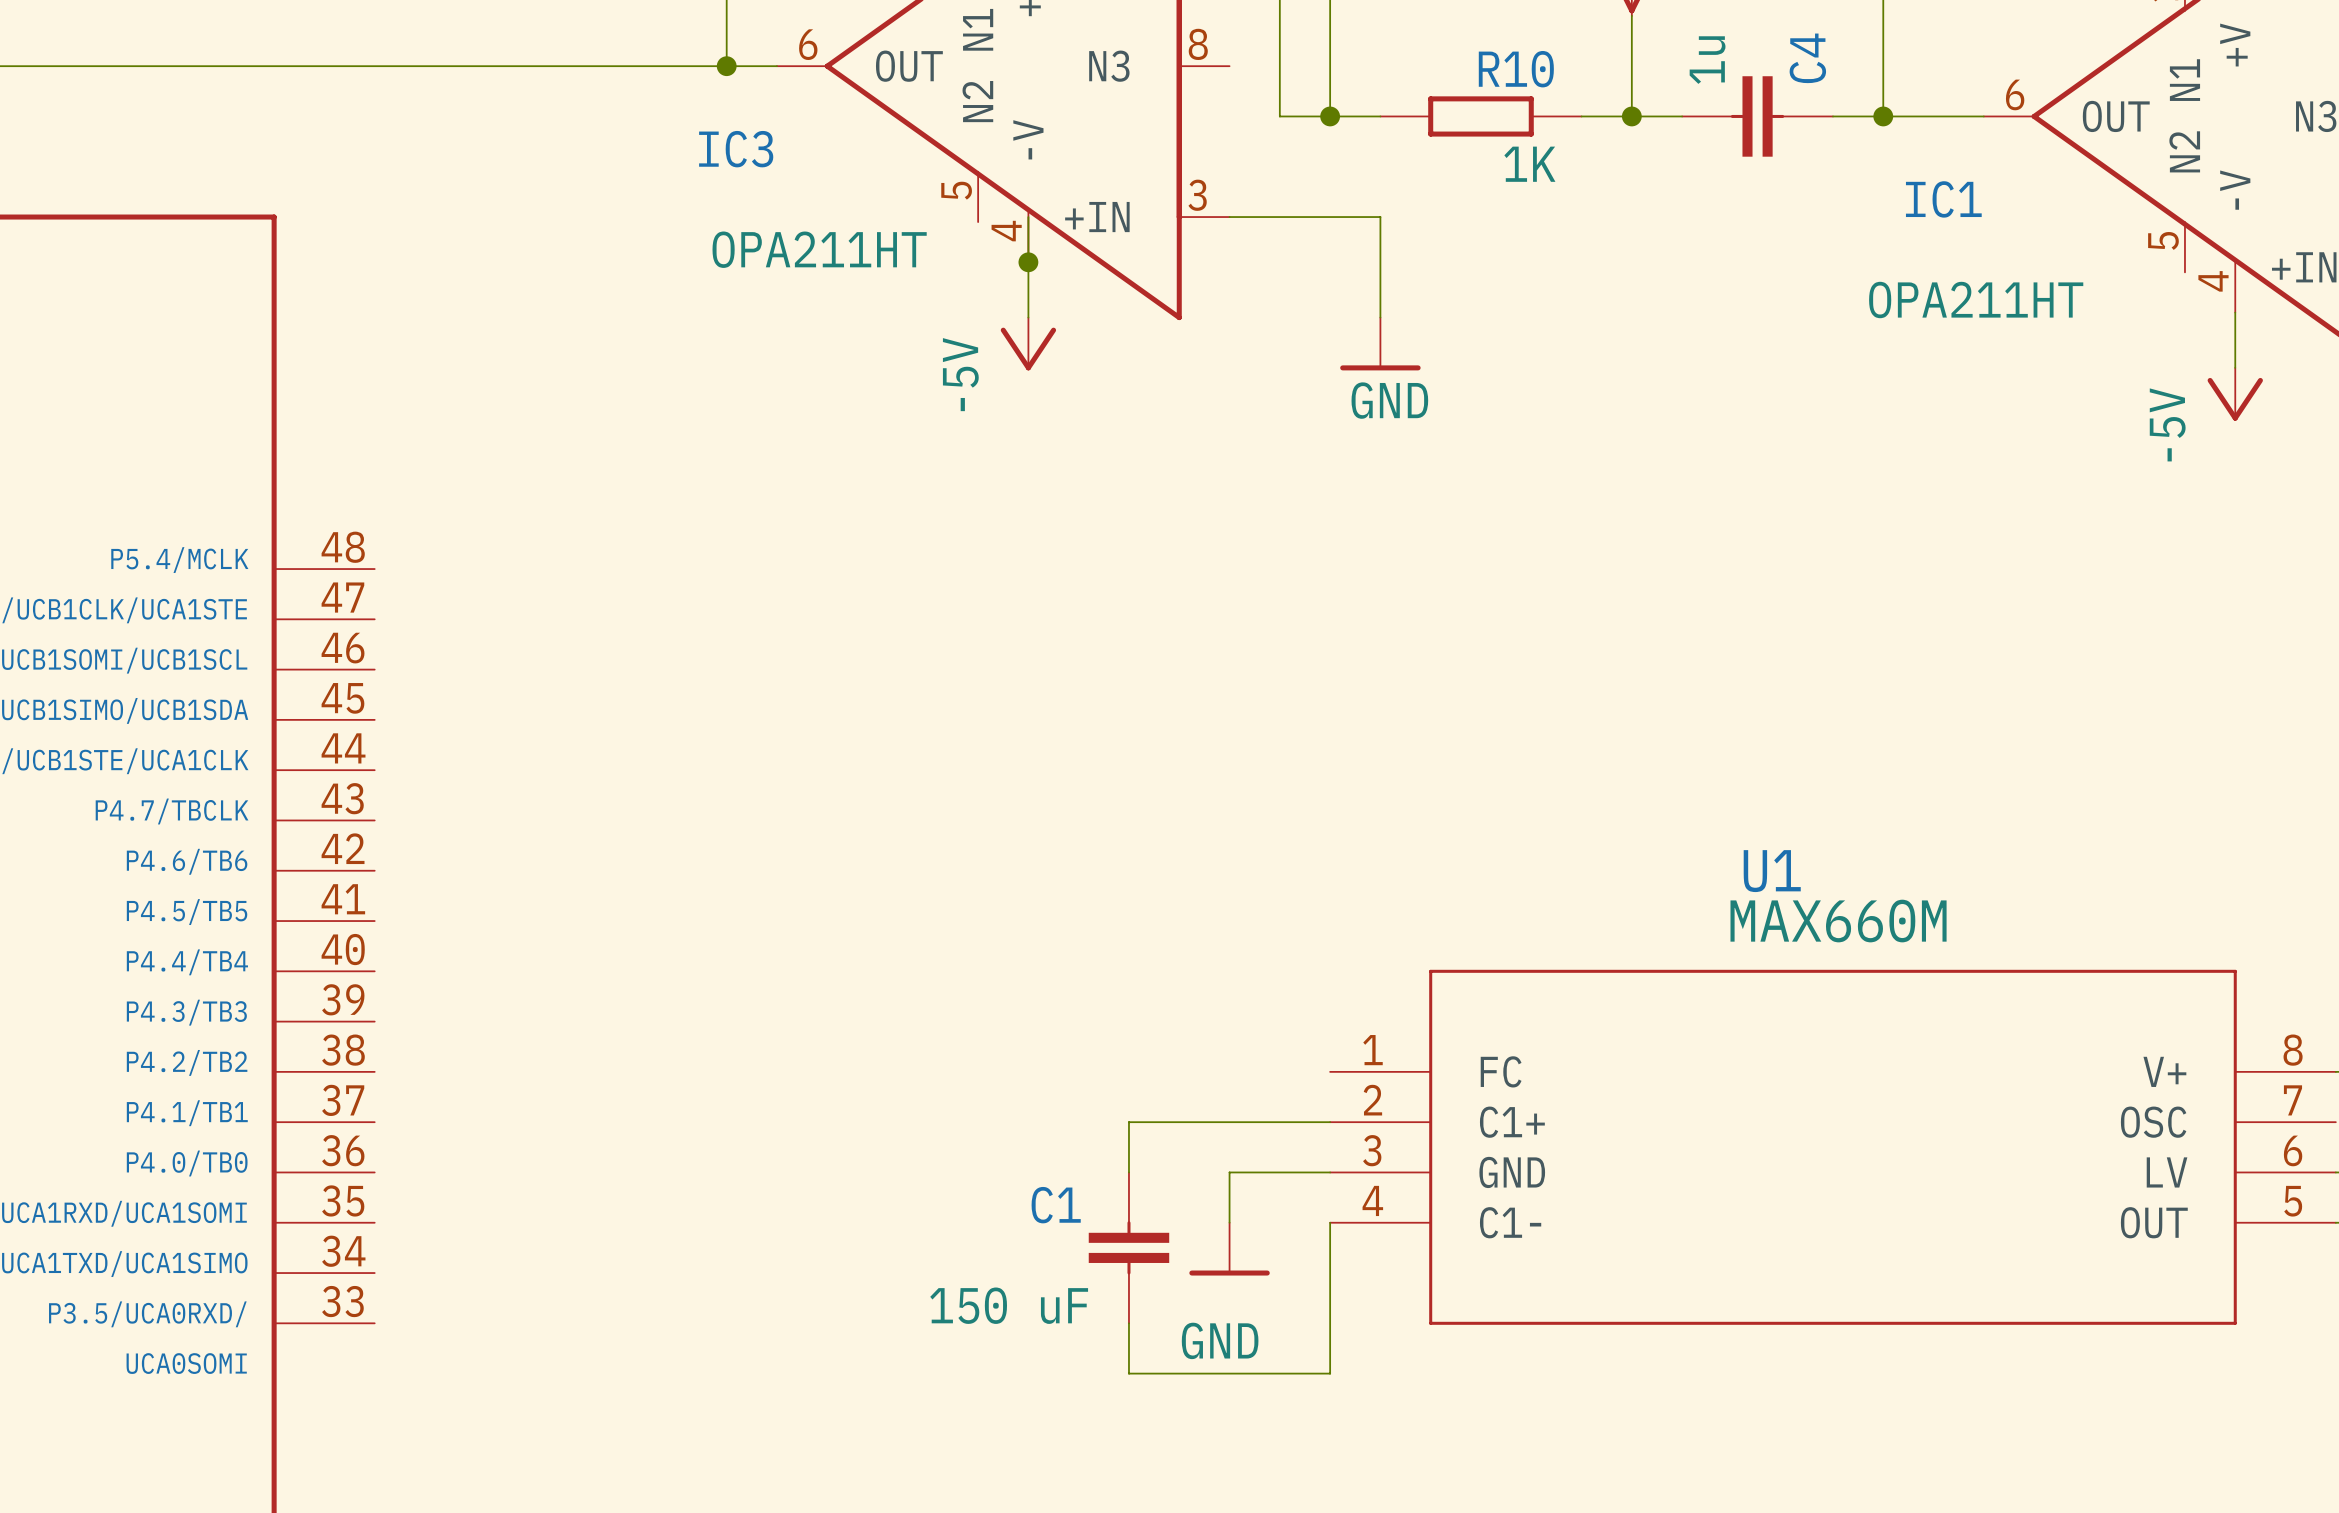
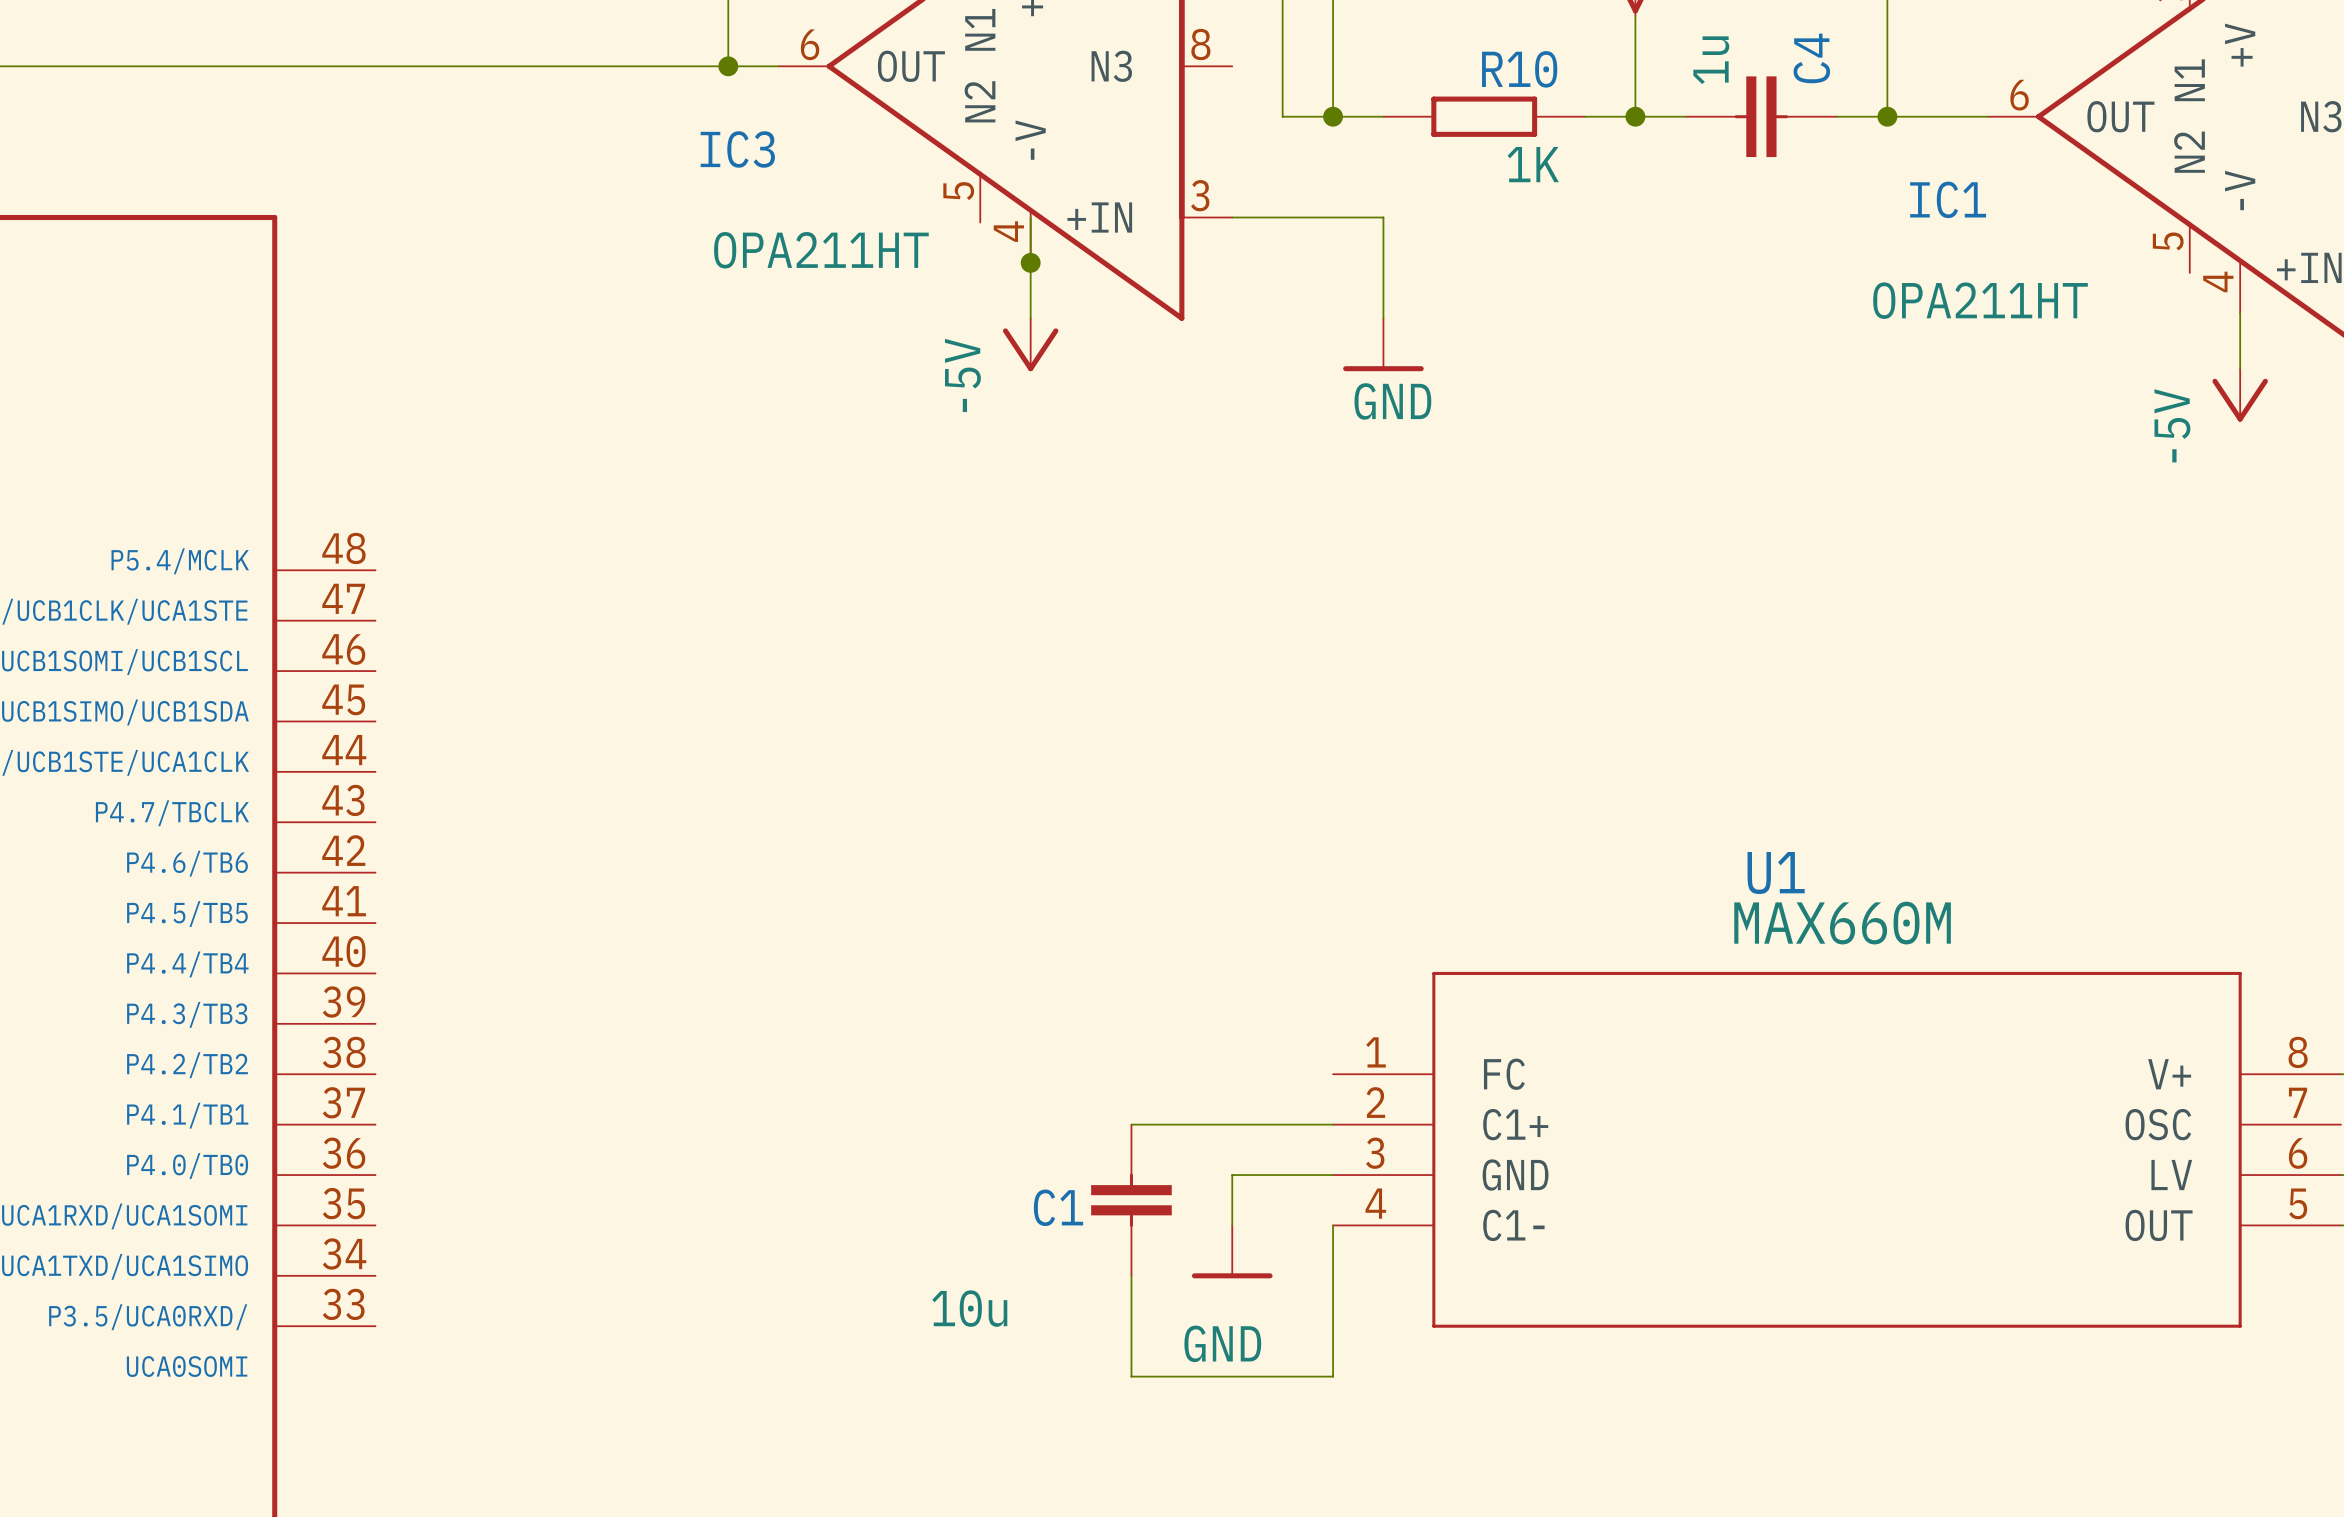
C1 position: (1128, 1247) -> (1131, 1200)
C1 value: 150 uF (1009, 1305) -> 10u (969, 1308)

